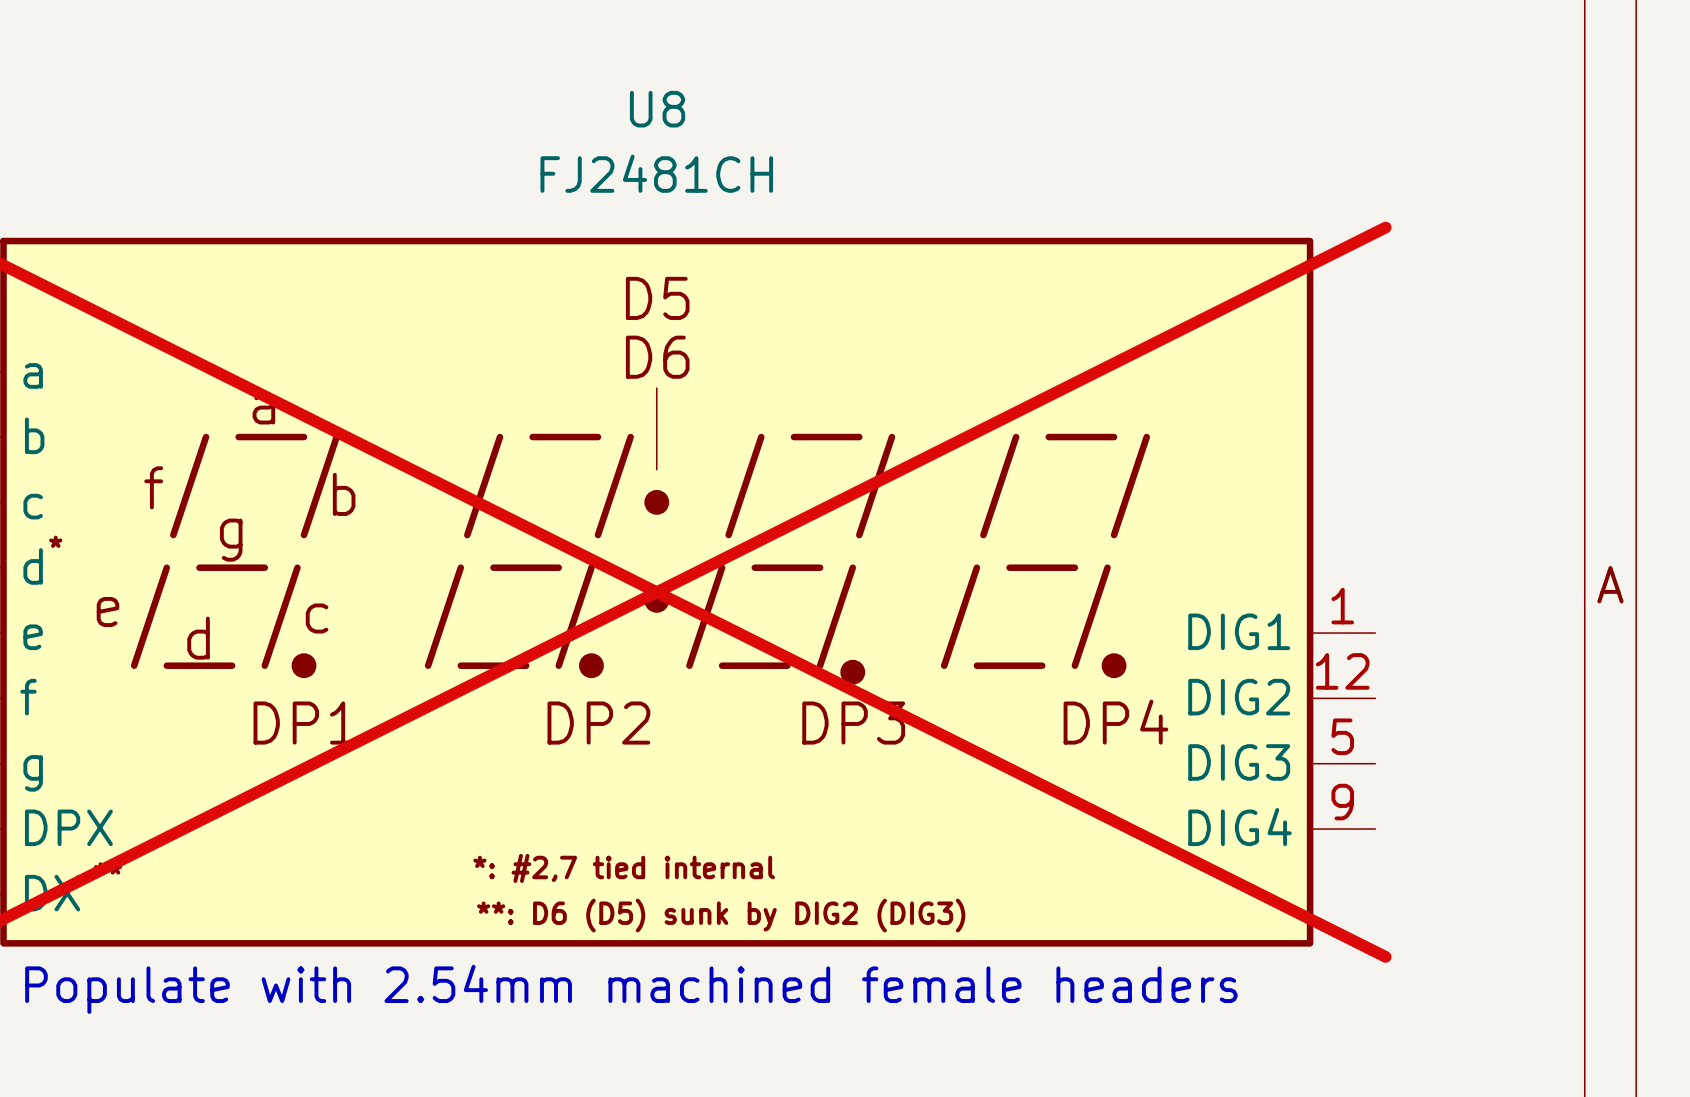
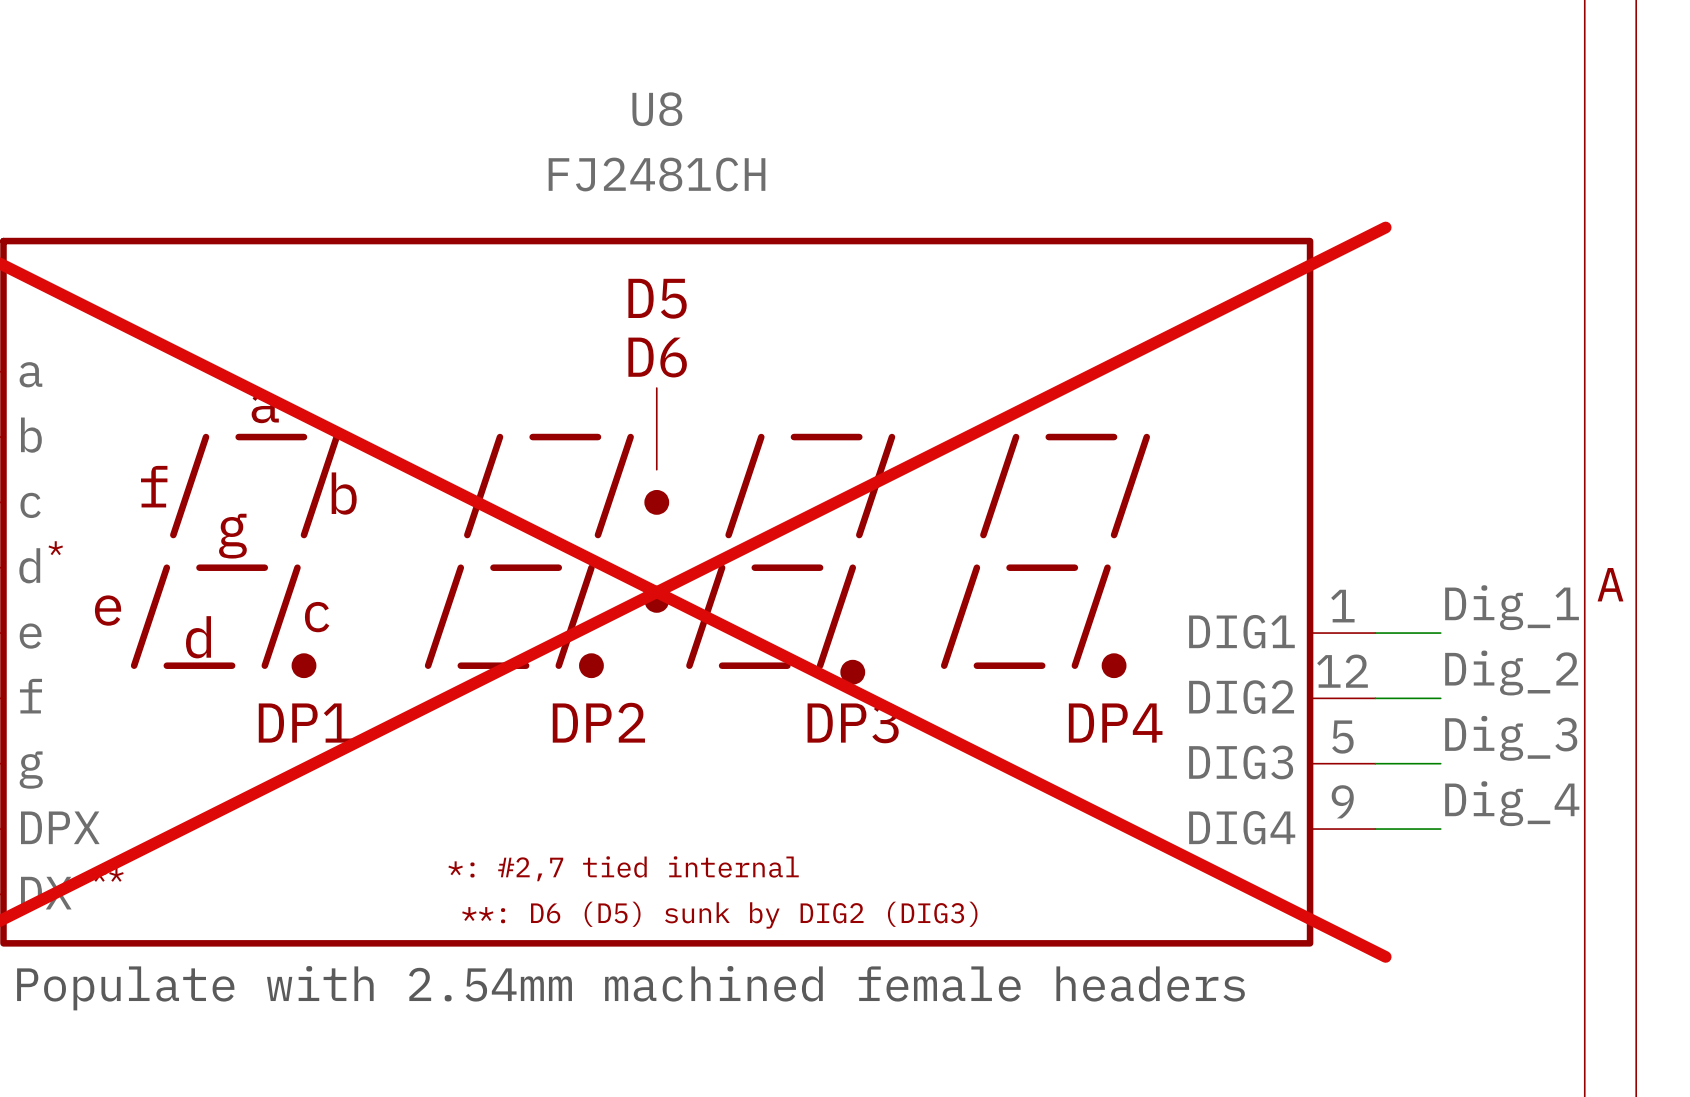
label: none -> Dig_1 (1512, 607)
wire: none -> (1375, 633) (1440, 633)
label: none -> Dig_2 (1511, 673)
wire: none -> (1375, 698) (1440, 698)
label: none -> Dig_3 (1511, 738)
wire: none -> (1375, 763) (1440, 763)
label: none -> Dig_4 (1512, 803)
wire: none -> (1375, 829) (1440, 829)

